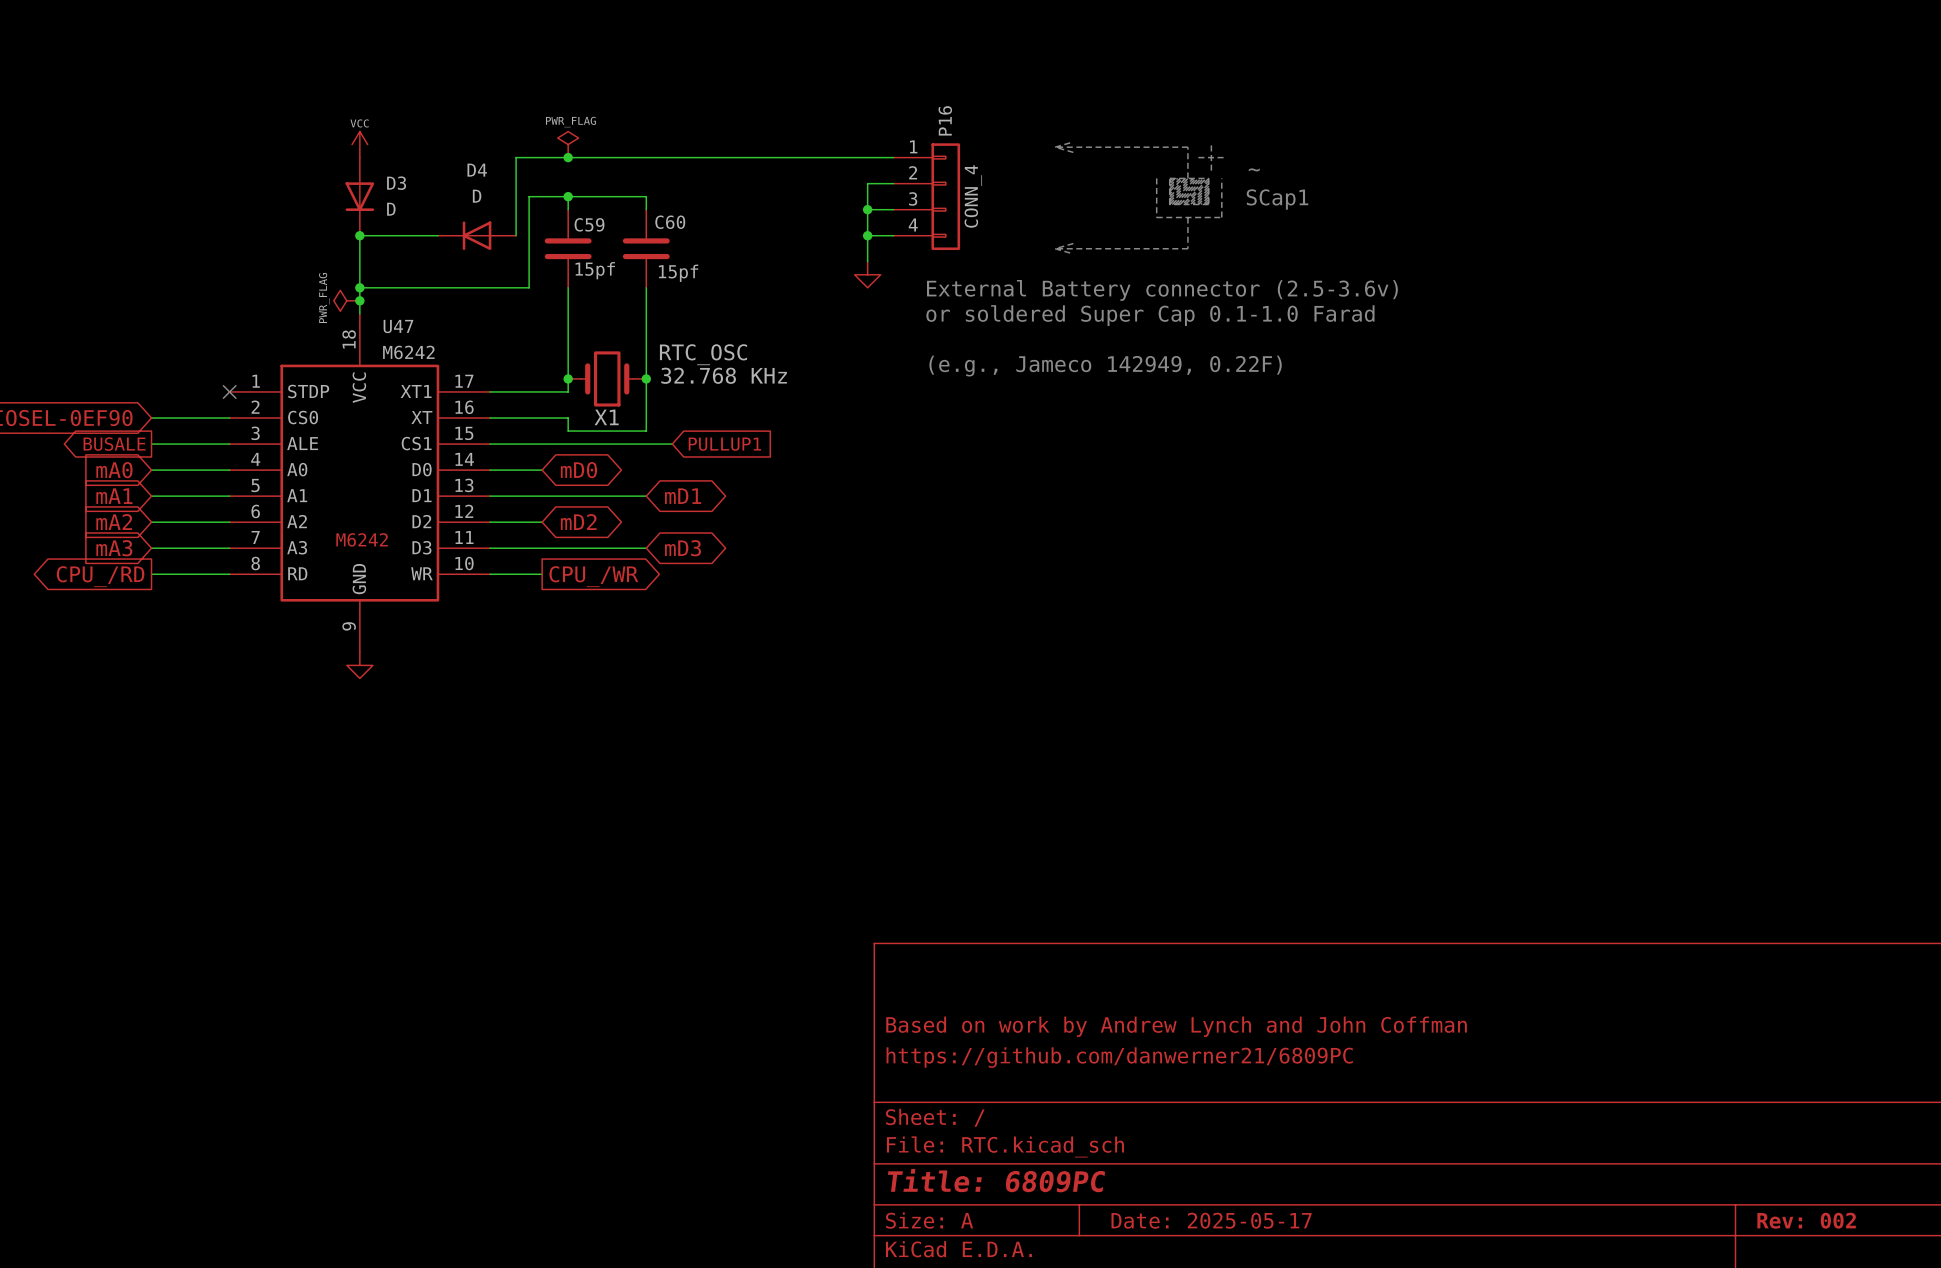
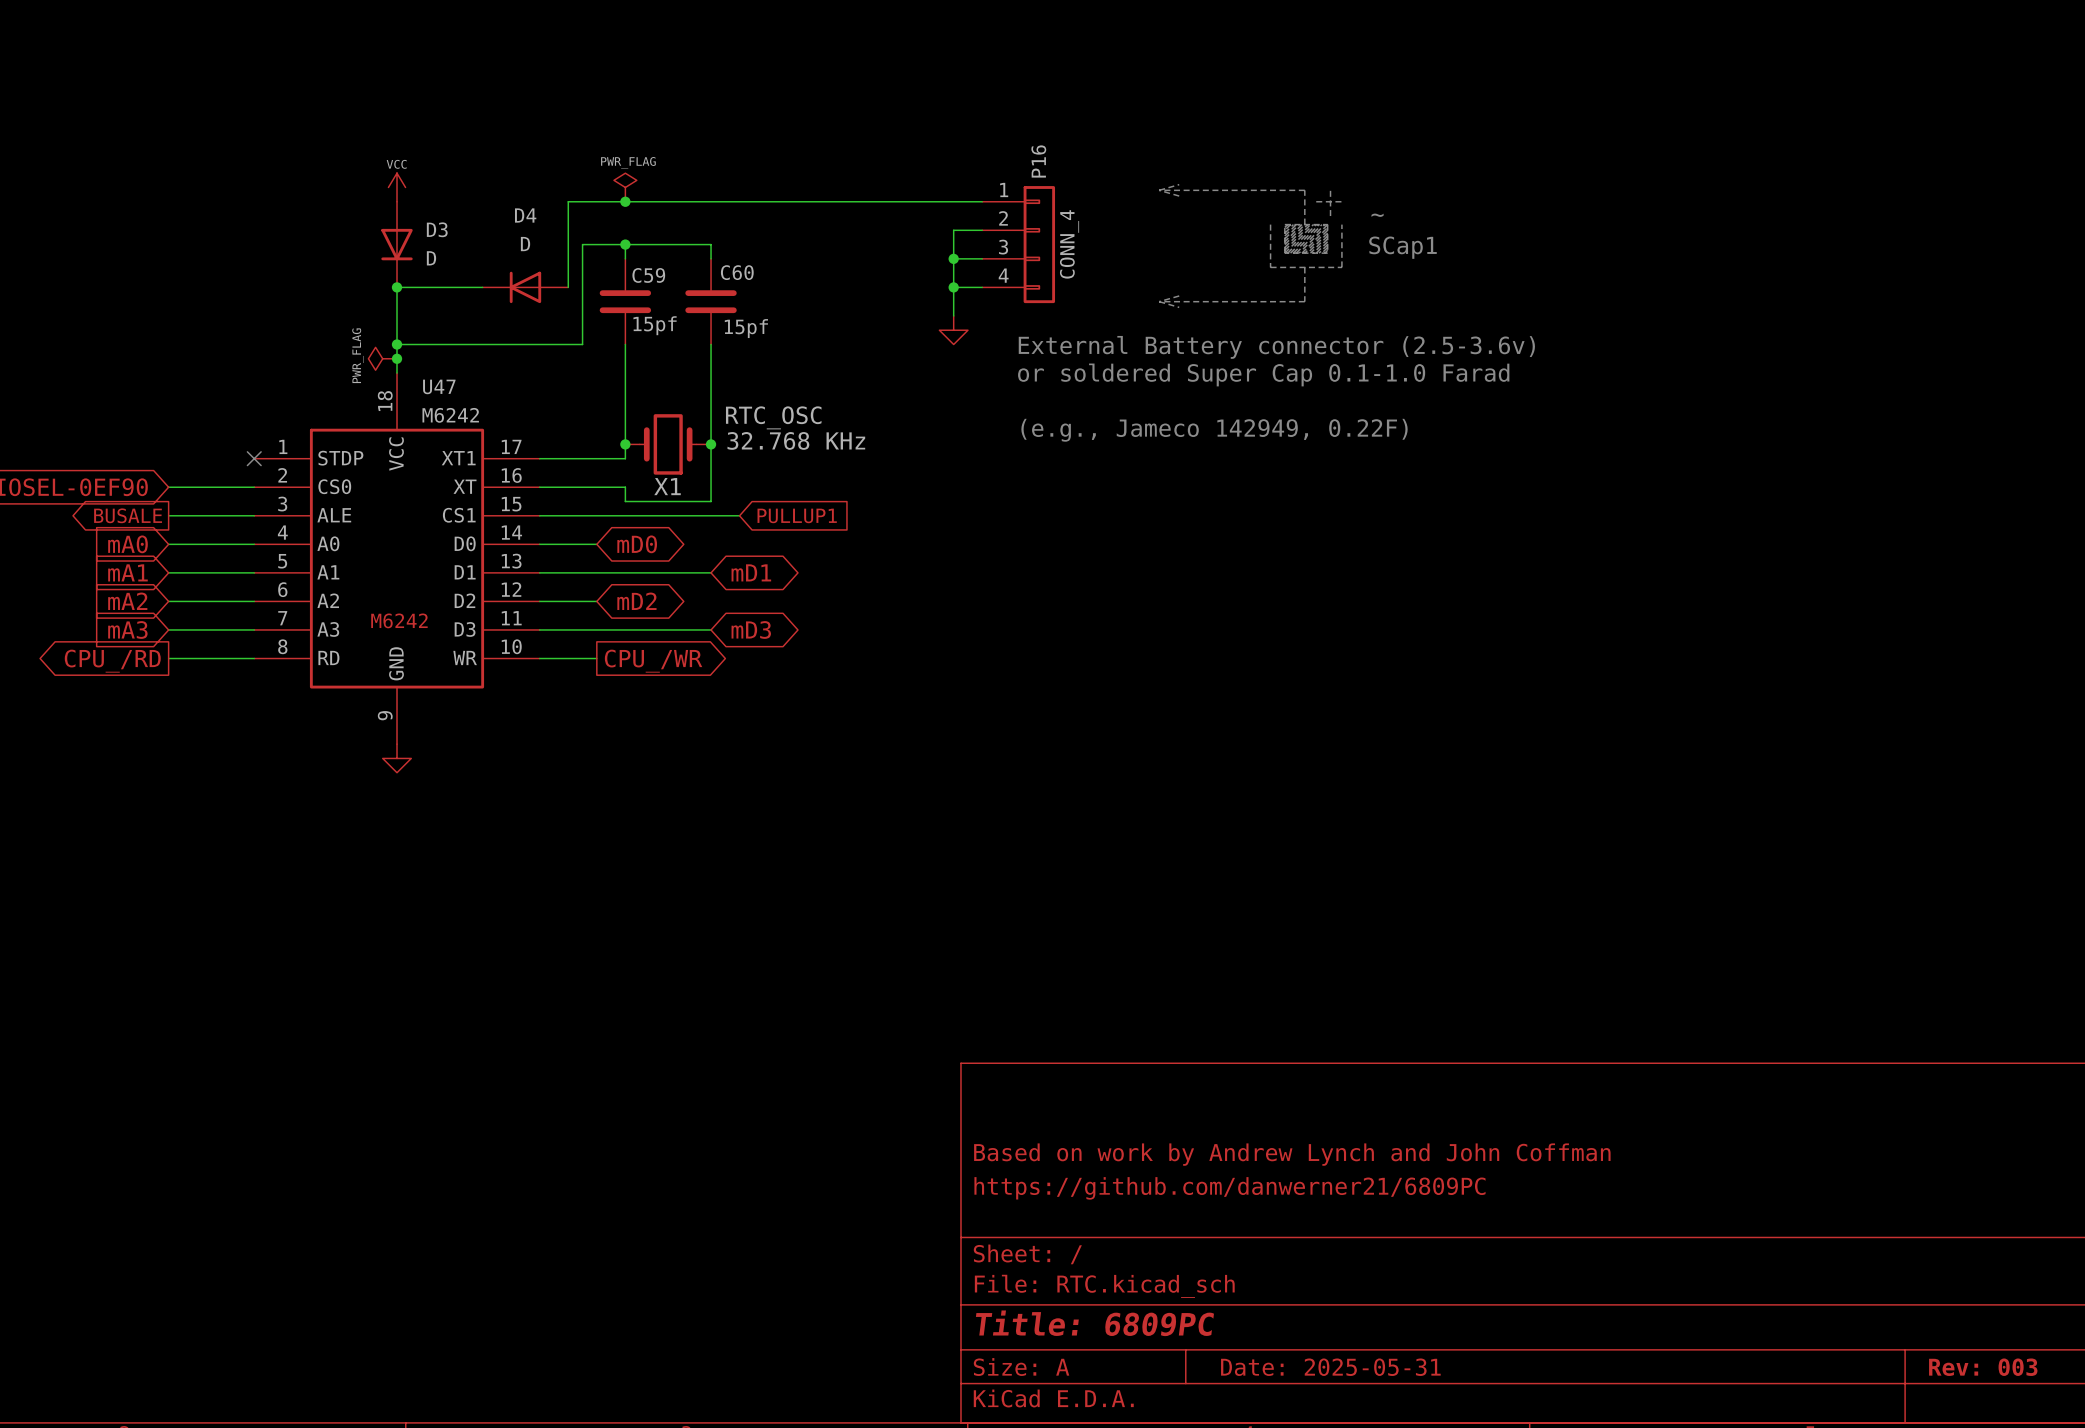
title block: Date: 2025-05-17 (1211, 1220) -> Date: 2025-05-31 (1330, 1367)
title block: Rev: 002 (1806, 1220) -> Rev: 003 (1983, 1367)

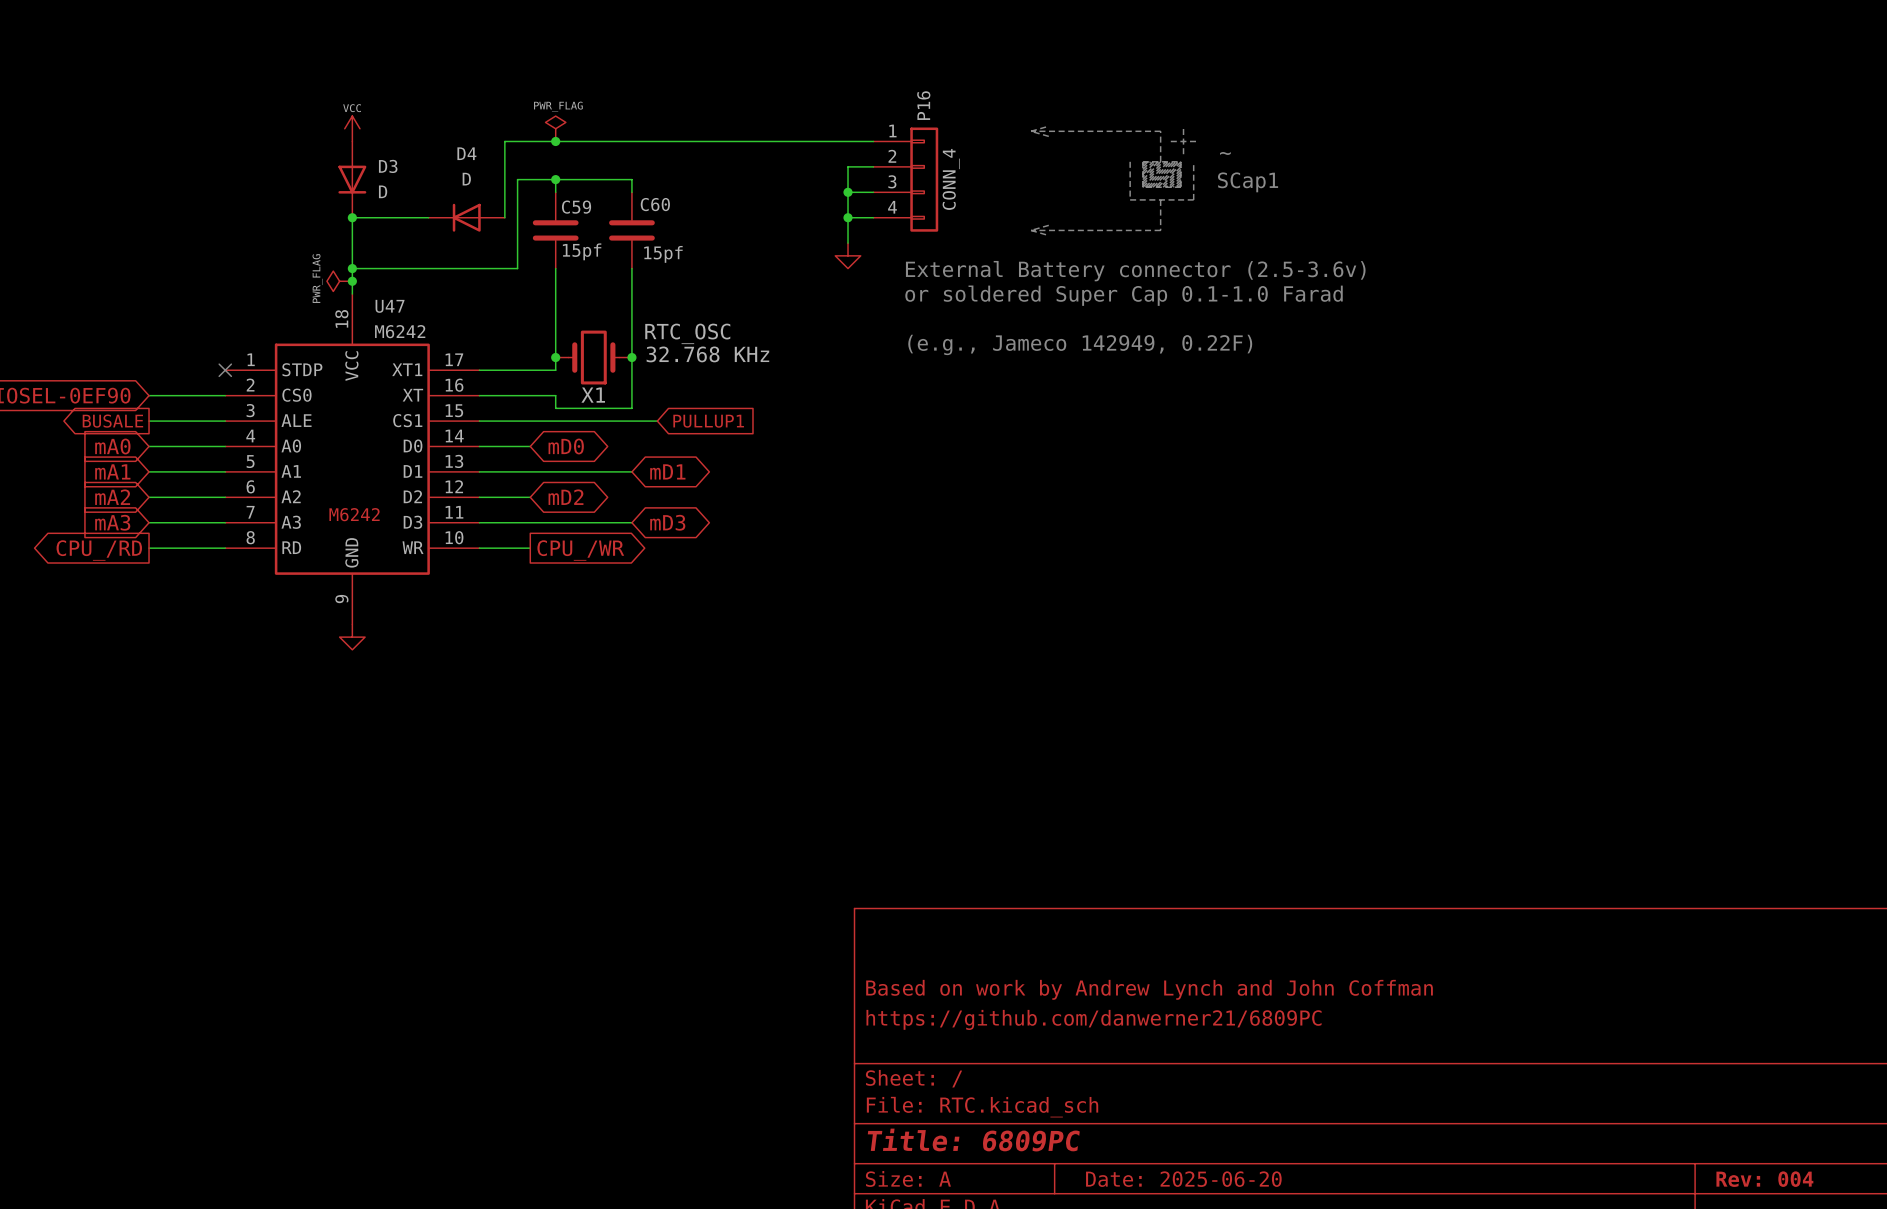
title block: Date: 2025-05-31 (1330, 1367) -> Date: 2025-06-20 (1183, 1179)
title block: Rev: 003 (1983, 1367) -> Rev: 004 (1764, 1179)

